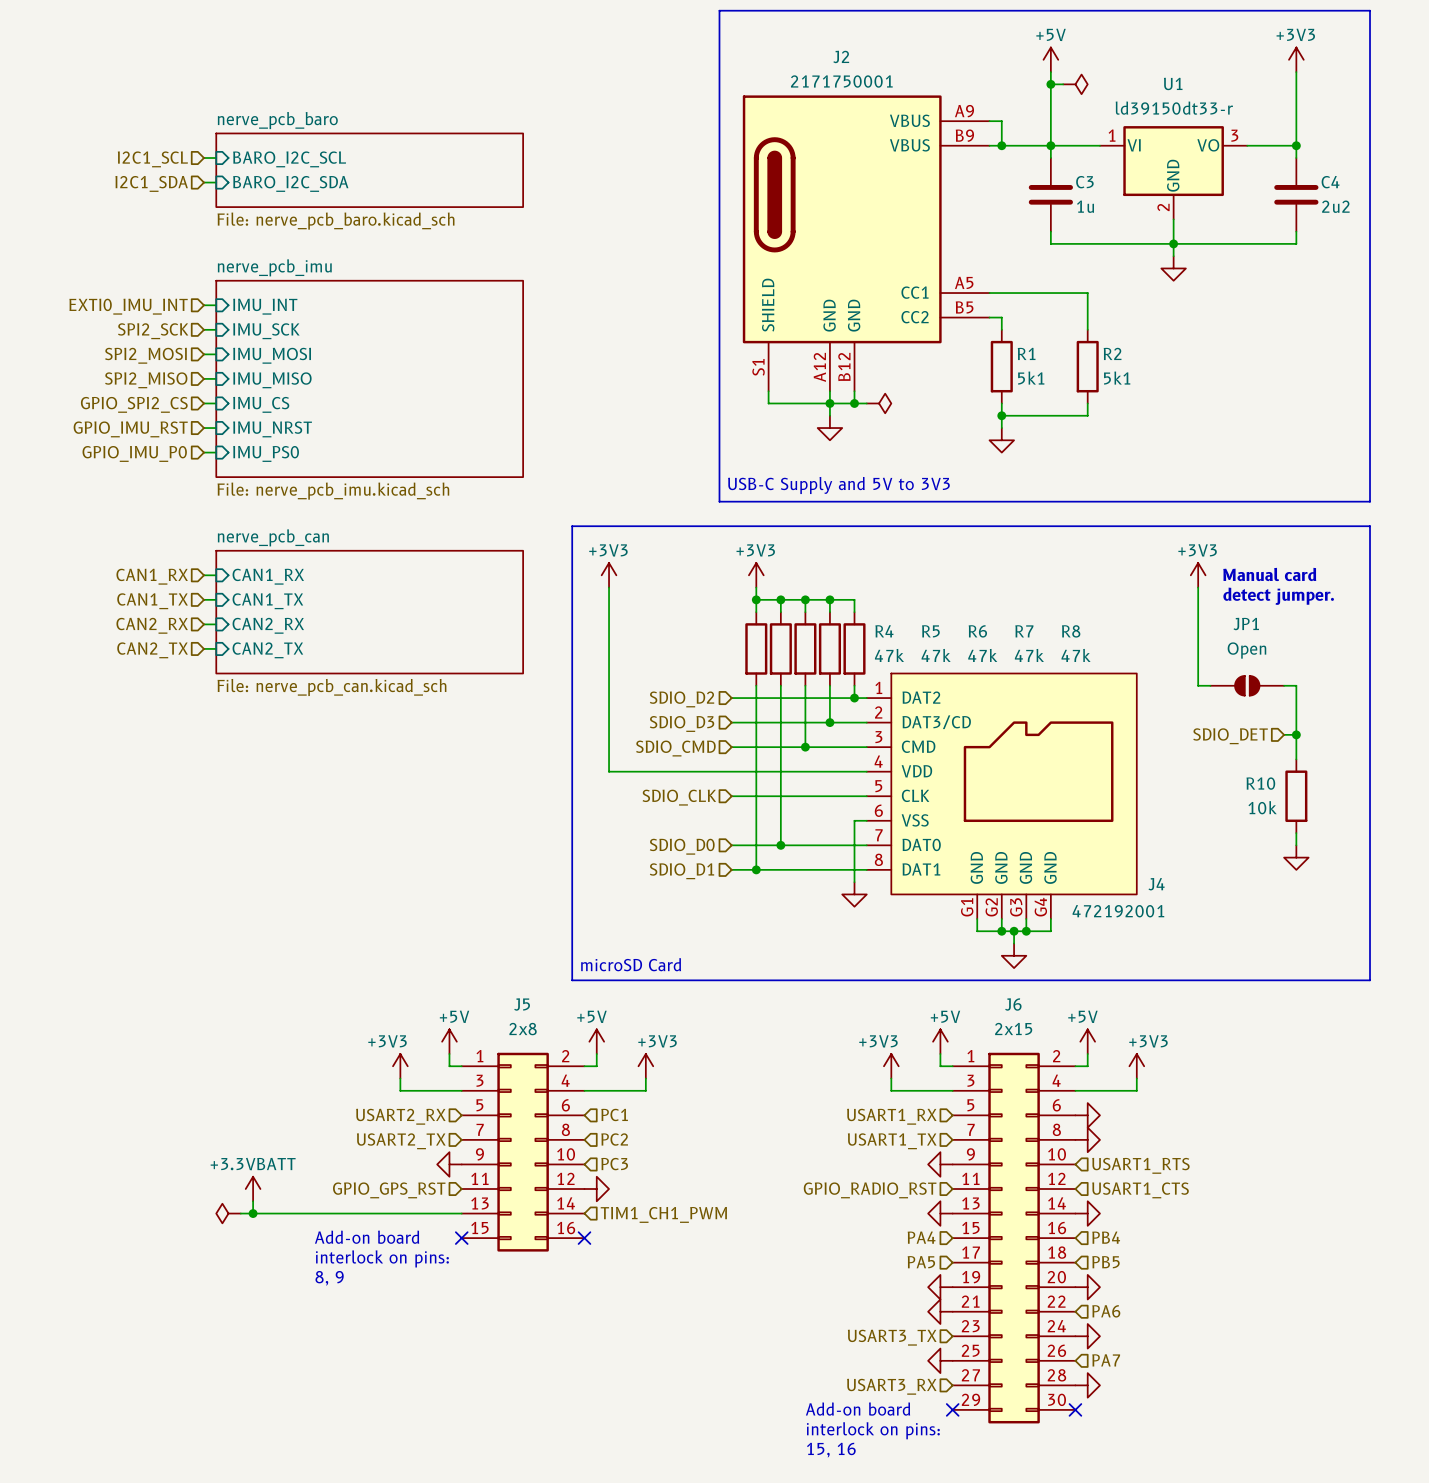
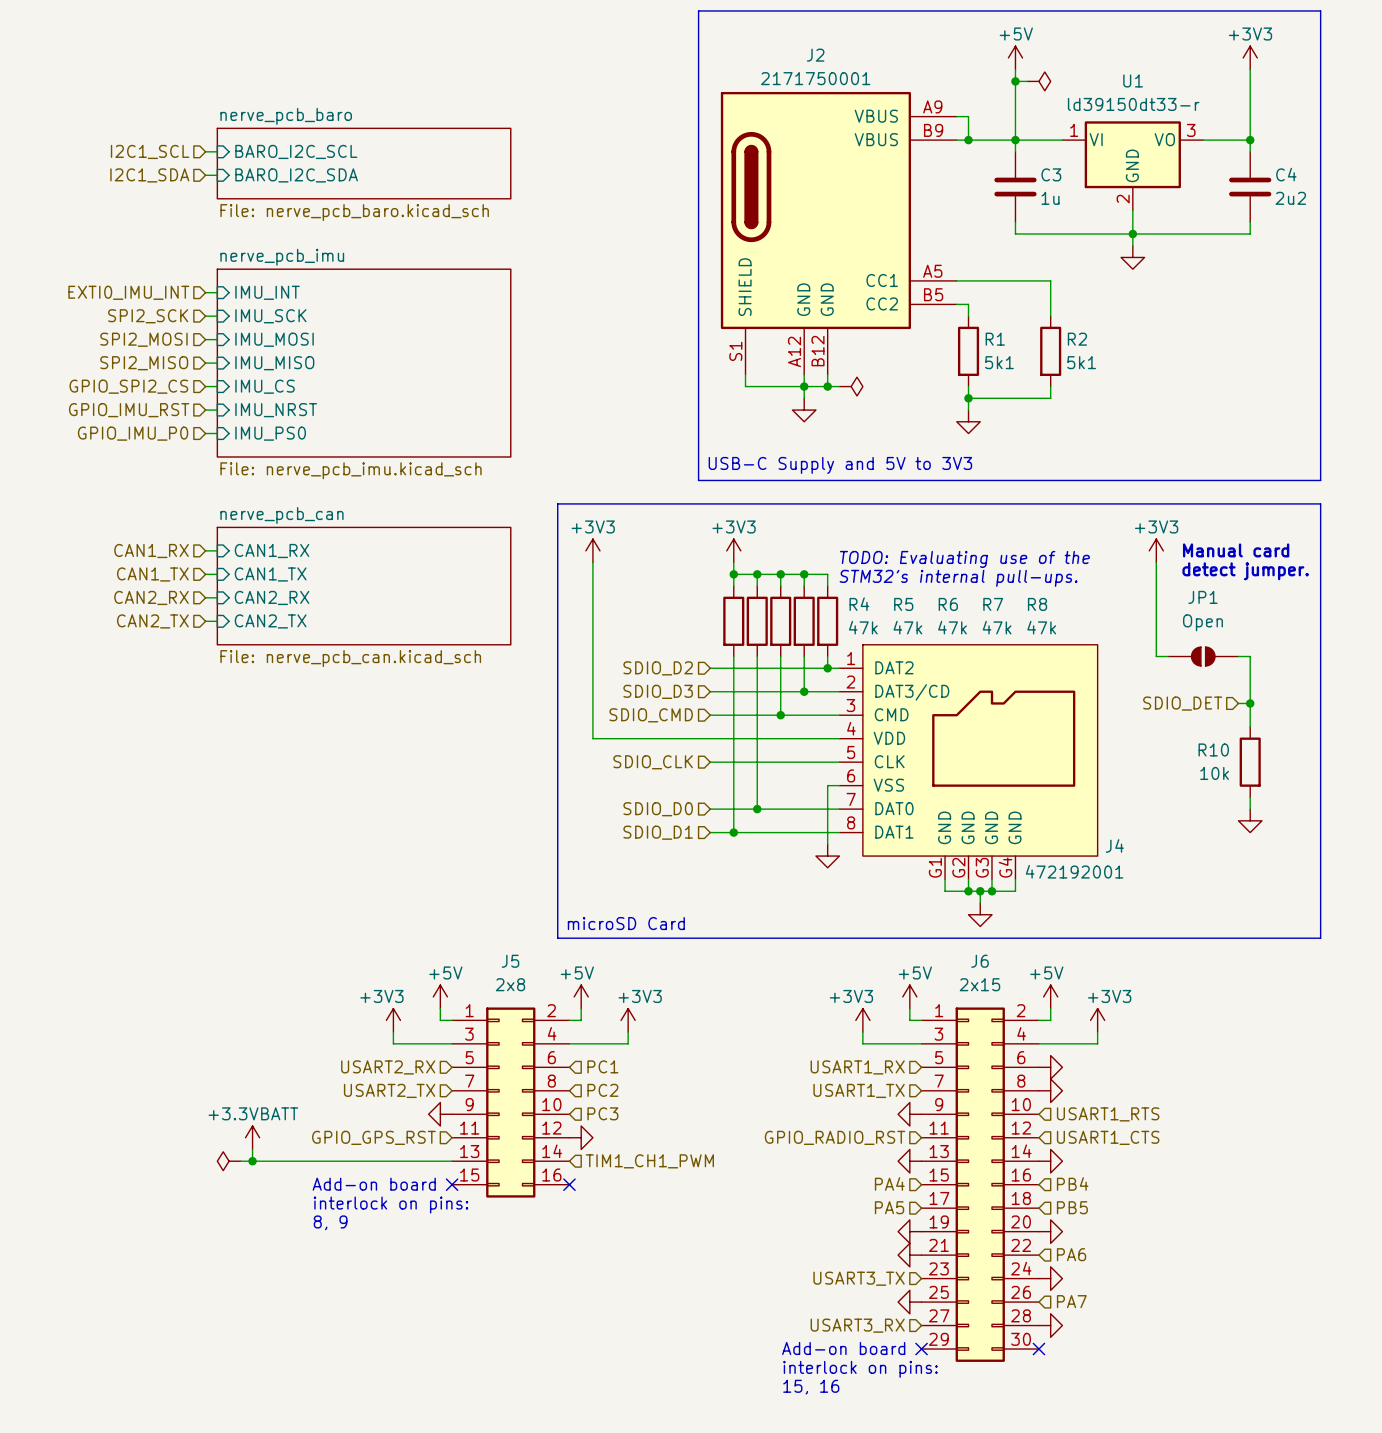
text: none -> TODO: Evaluating use of the (964, 559)
text: none -> STM32's internal pull-ups. (958, 578)

